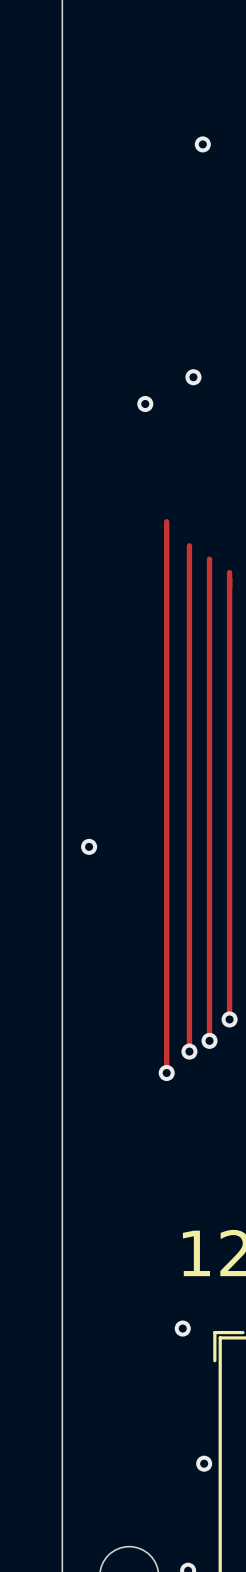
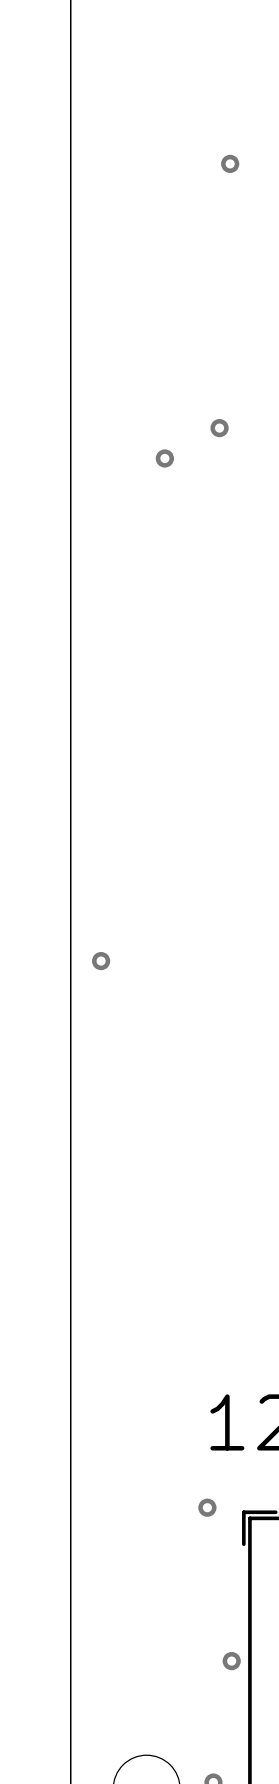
track: (166, 521) (166, 1073) -> none
track: (189, 545) (189, 1054) -> none
track: (209, 559) (209, 1040) -> none
track: (229, 572) (229, 1020) -> none
via: (229, 1019) -> none
via: (209, 1040) -> none
via: (189, 1051) -> none
via: (166, 1073) -> none

